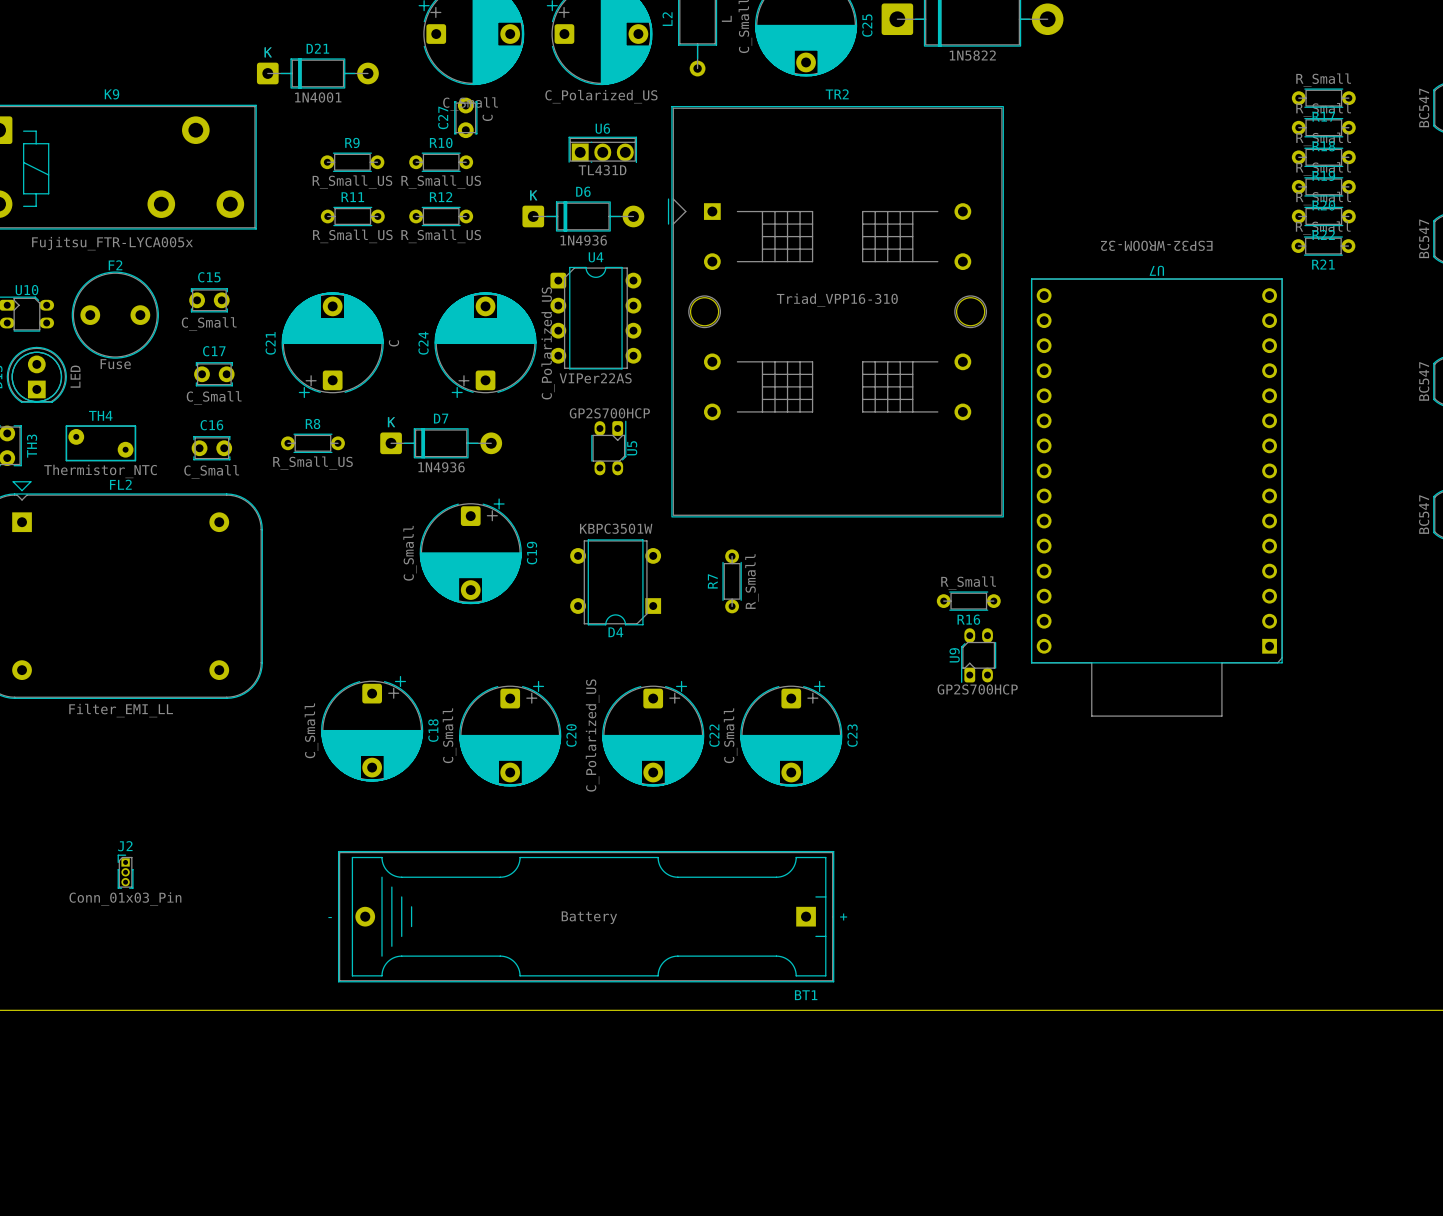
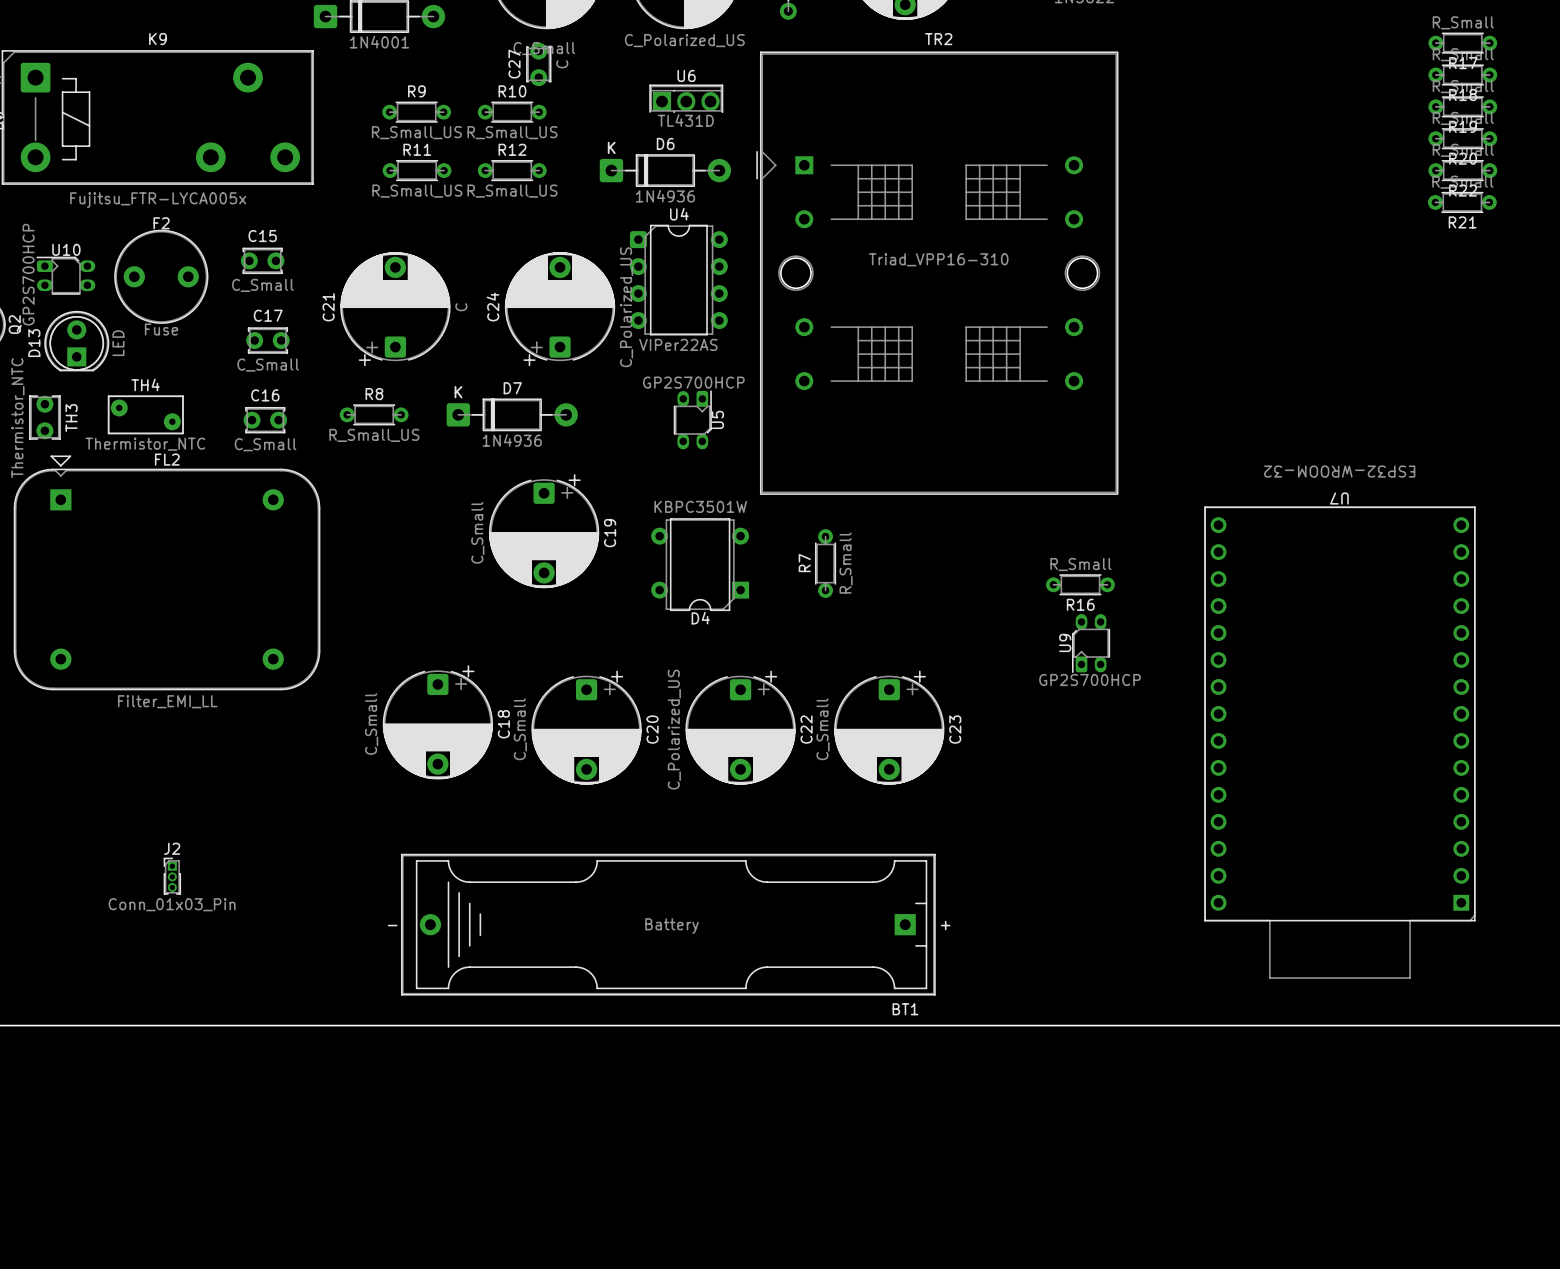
U7 position: (1156, 497) -> (1339, 742)

